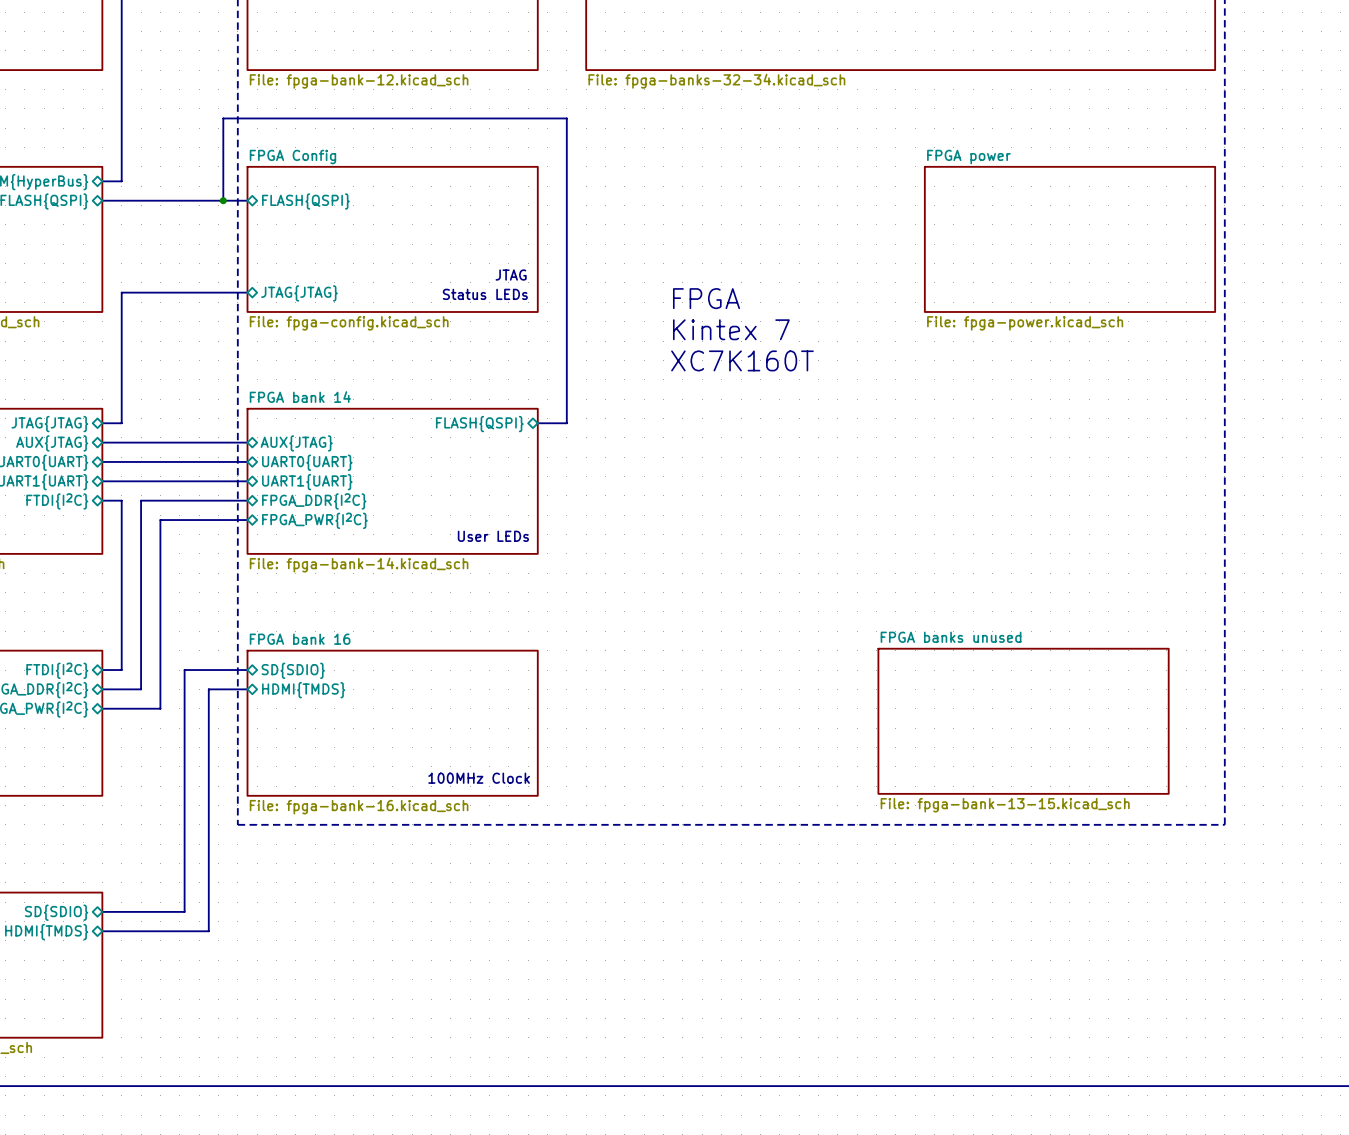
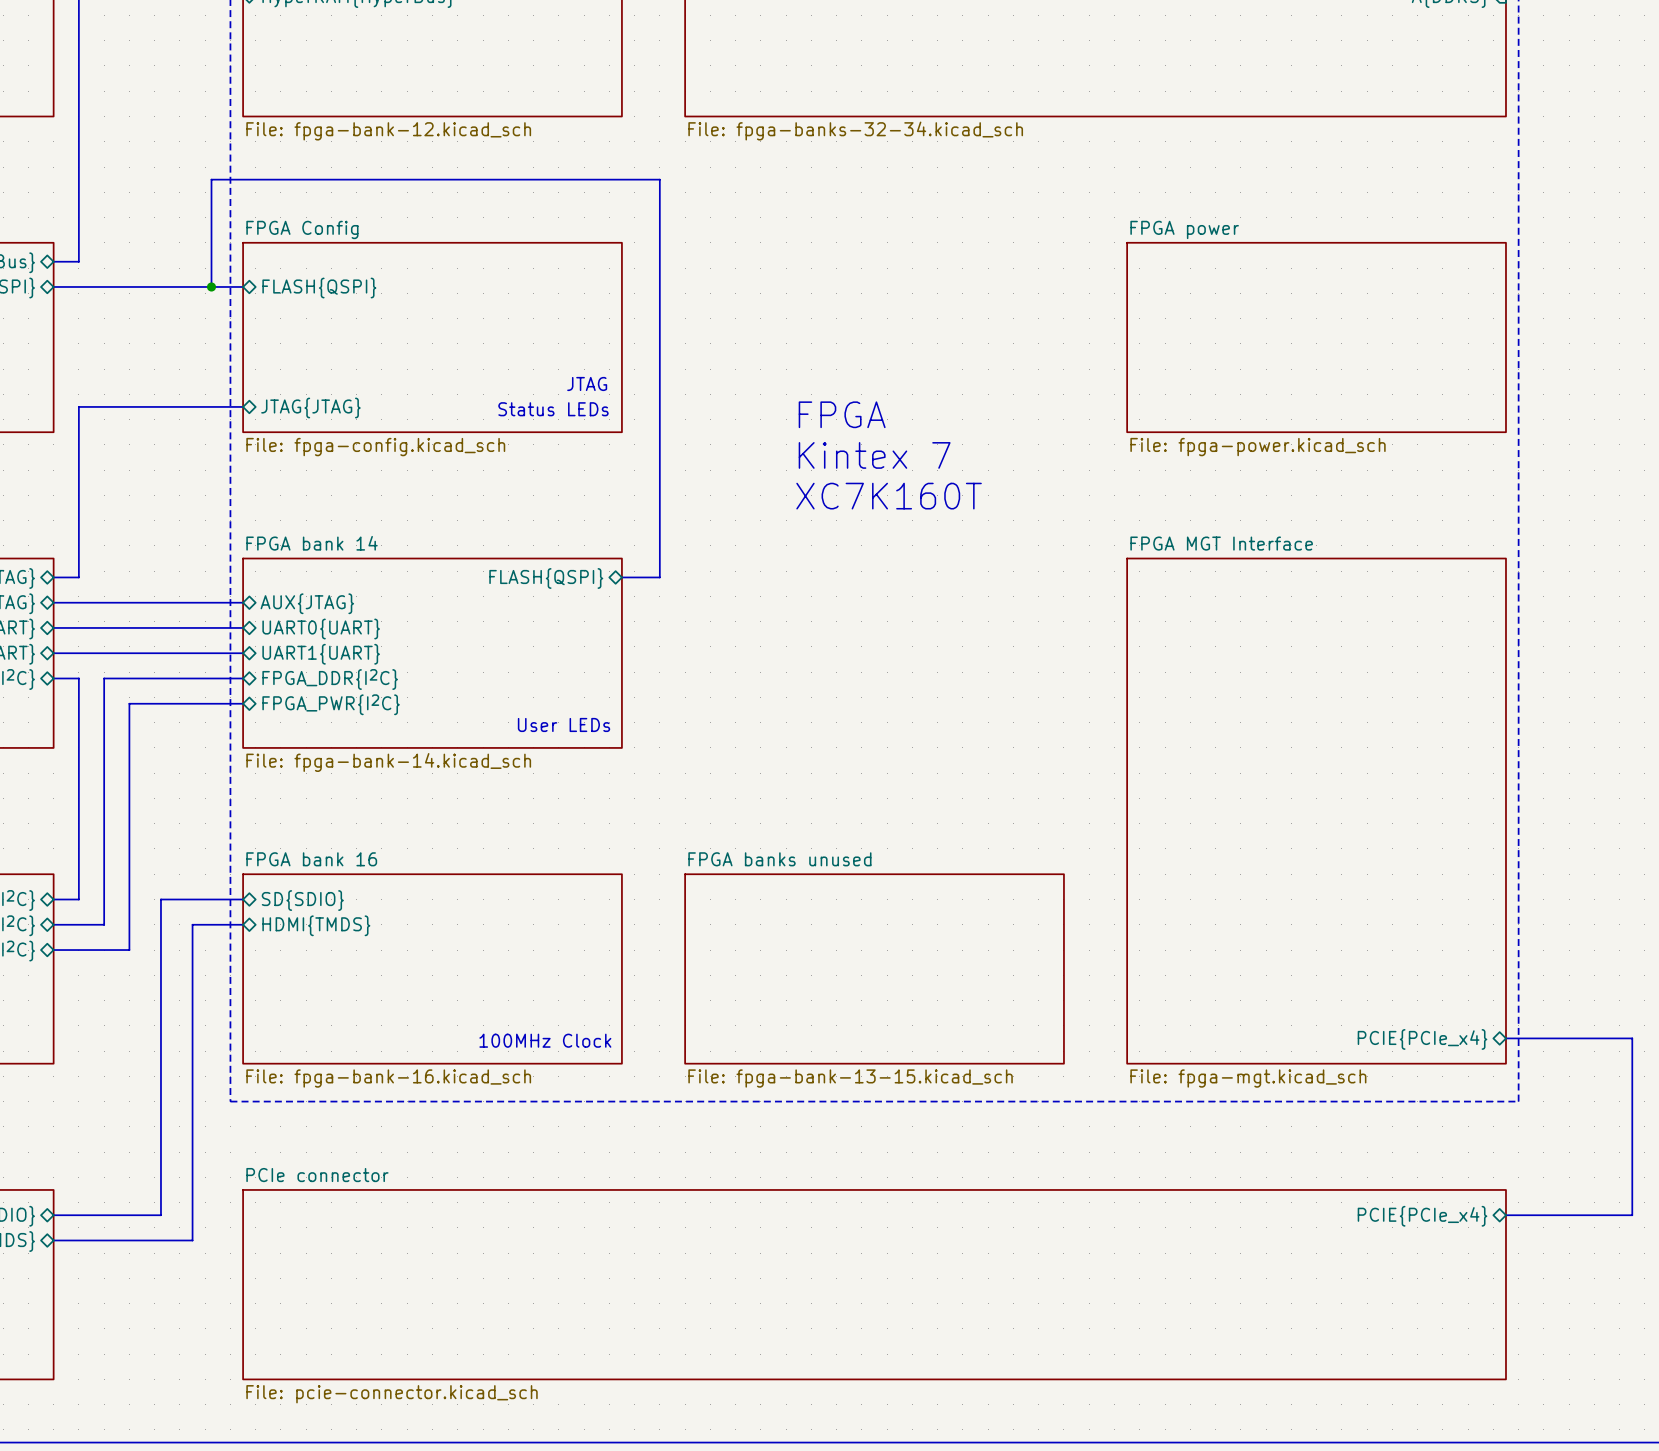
sheet FPGA MGT Interface: none -> File: fpga-mgt.kicad_sch (1316, 811)
sheet FPGA banks unused: File: fpga-bank-13-15.kicad_sch (1023, 721) -> none
sheet FPGA banks unused: none -> File: fpga-bank-13-15.kicad_sch (874, 968)
bus: none -> (1505, 1038) (1632, 1038) (1632, 1215) (1505, 1215)
sheet pin: none -> PCIE{PCIe_x4} (1422, 1039)
sheet pin: none -> PCIE{PCIe_x4} (1422, 1216)
sheet PCIe connector: none -> File: pcie-connector.kicad_sch (874, 1284)

